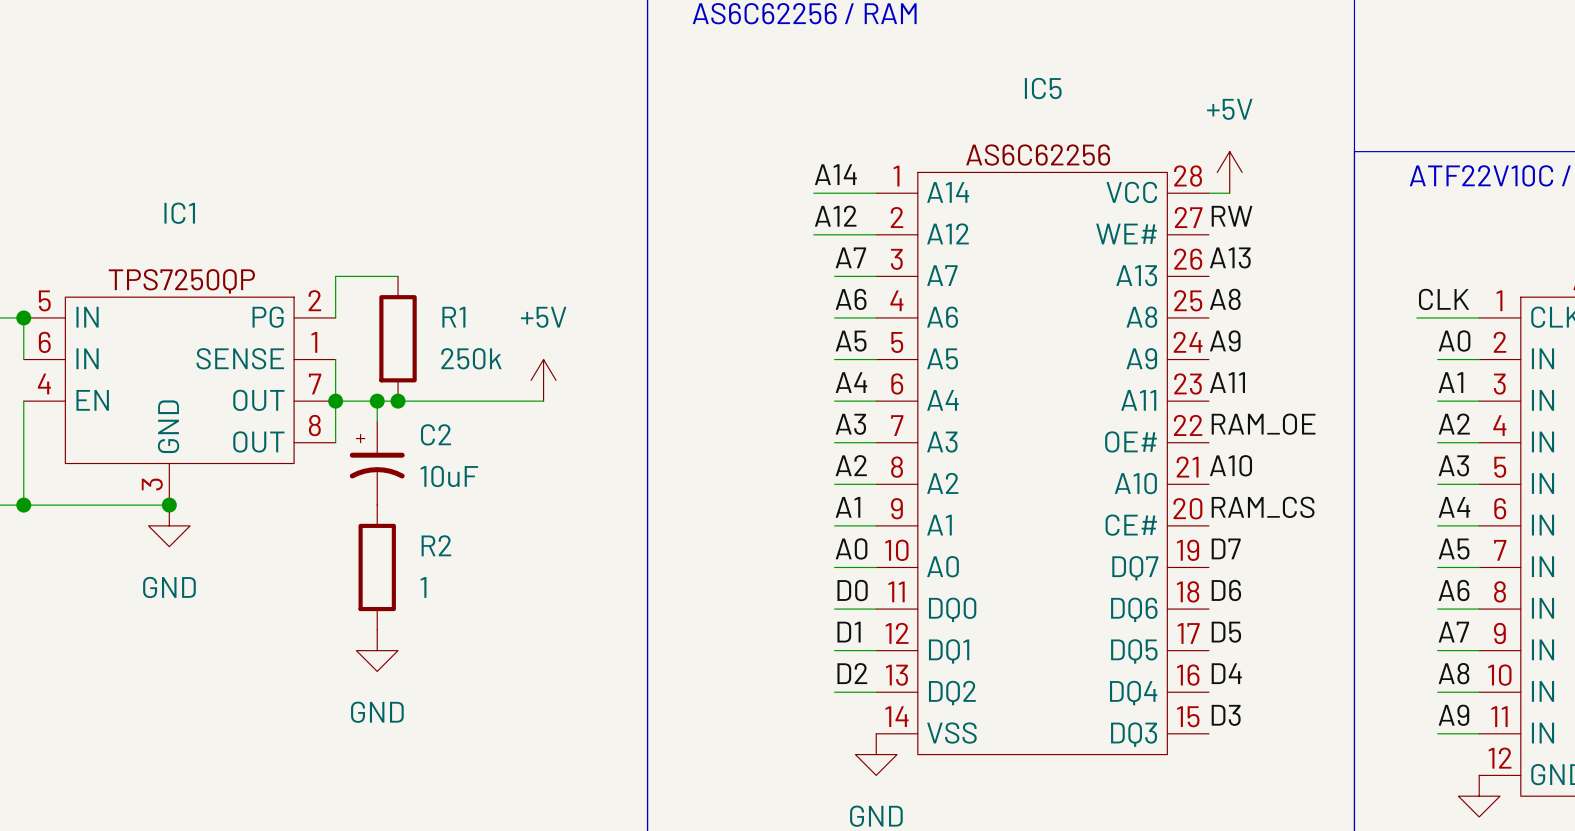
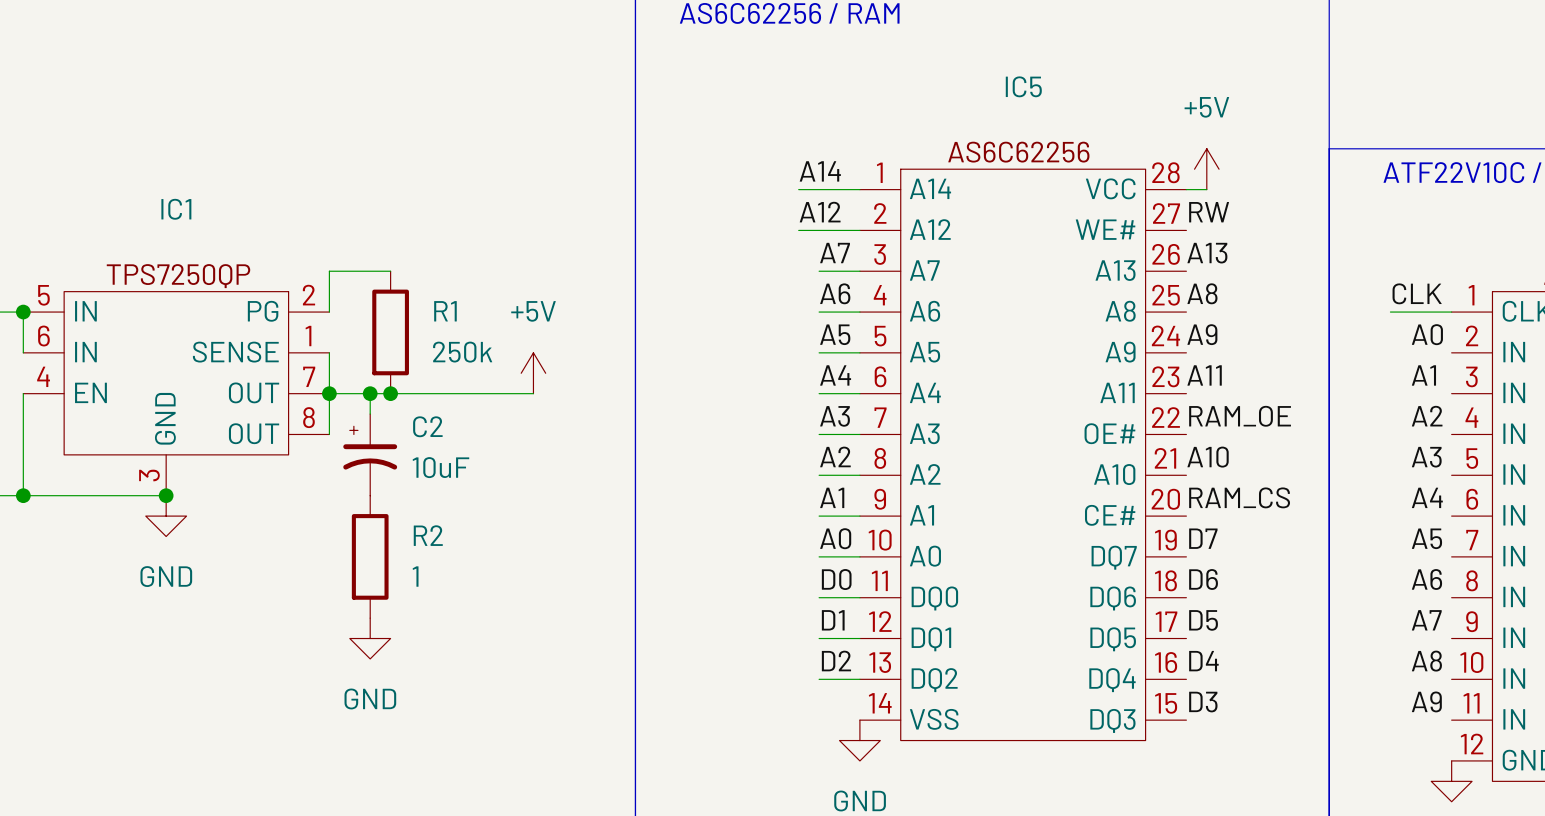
wire: (1437, 359) (1479, 359) -> none
wire: (1437, 401) (1479, 401) -> none
wire: (1437, 442) (1479, 442) -> none
wire: (1437, 484) (1479, 484) -> none
wire: (1437, 525) (1479, 525) -> none
wire: (1437, 567) (1479, 567) -> none
wire: (1437, 609) (1479, 609) -> none
wire: (1437, 650) (1479, 650) -> none
wire: (1437, 692) (1479, 692) -> none
wire: (1437, 733) (1479, 733) -> none

